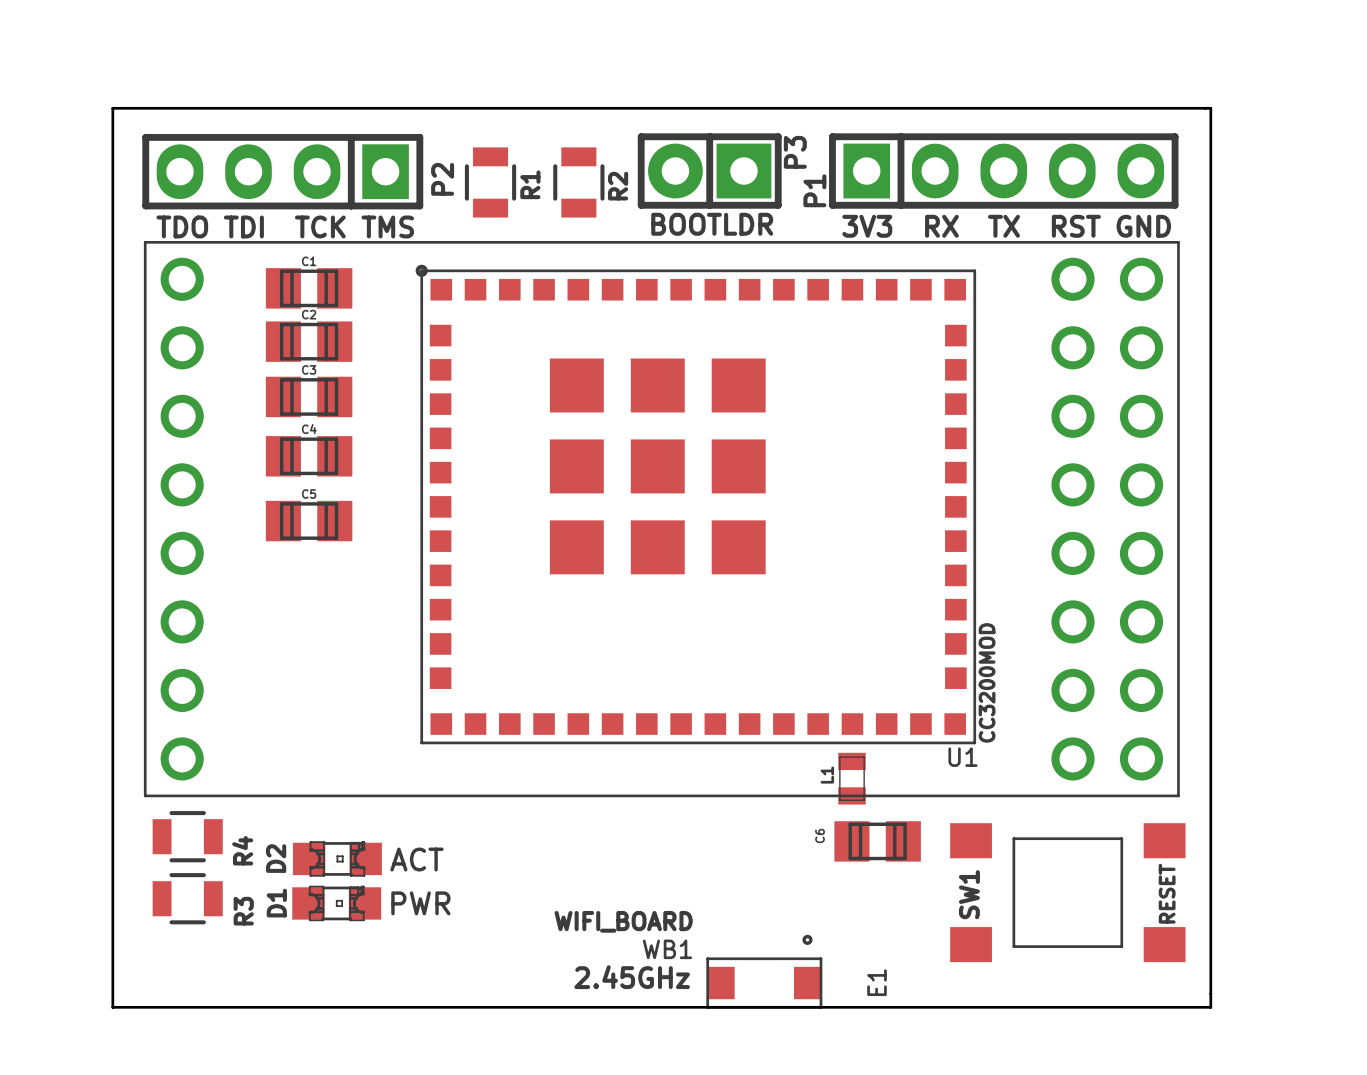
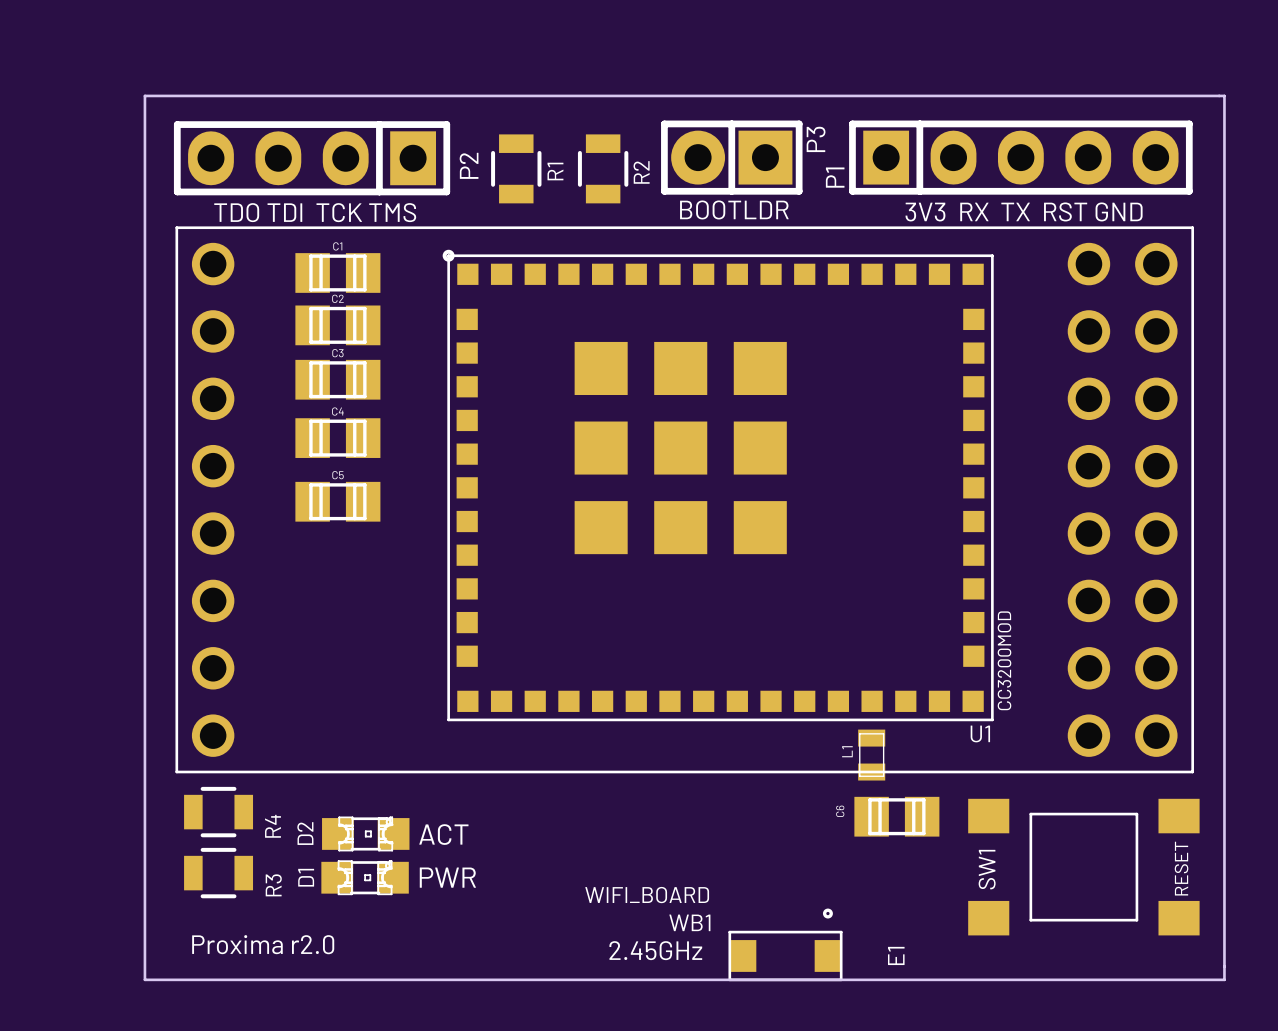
text: none -> Proxima r2.0 (263, 944)

